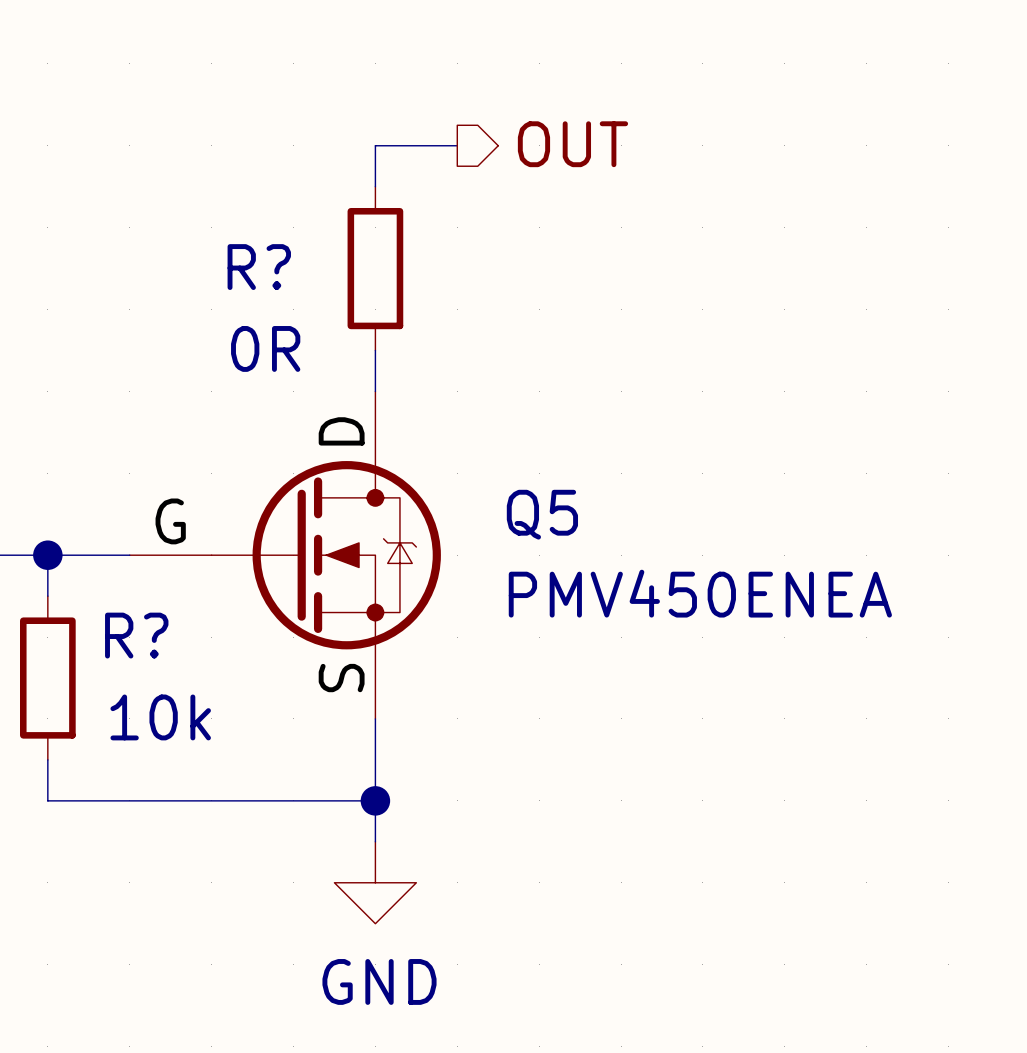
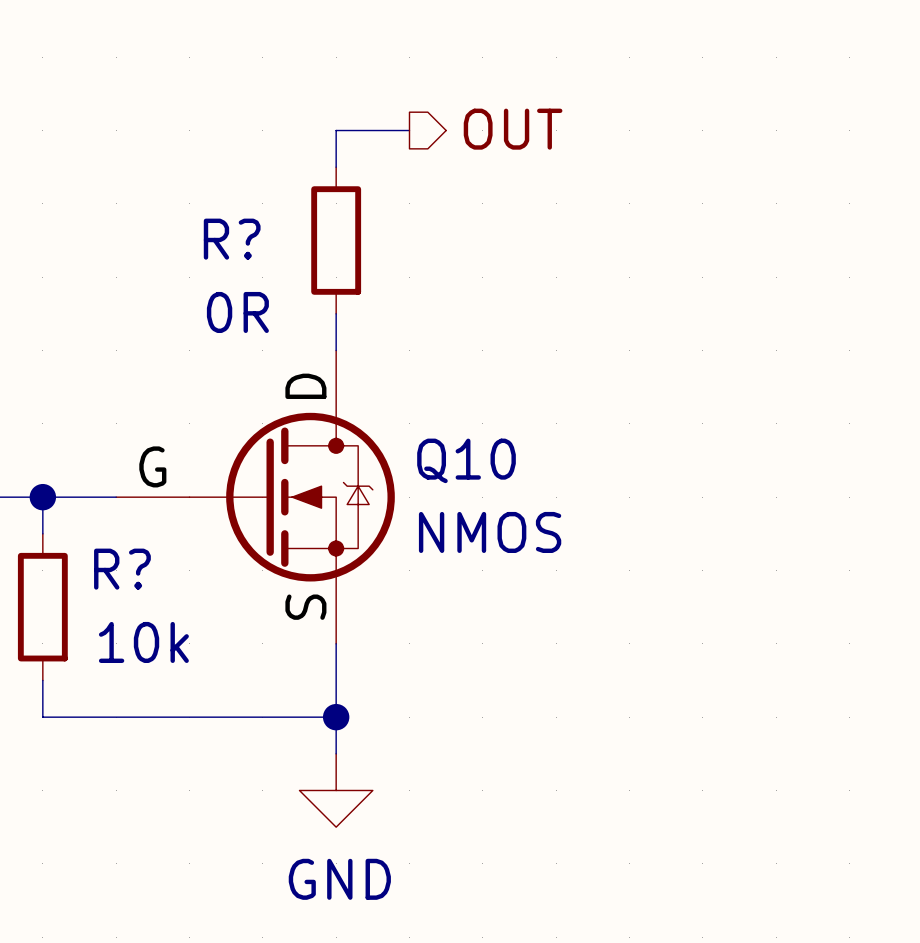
Q5 name: Q5 (542, 514) -> Q10 (466, 460)
Q5 value: PMV450ENEA (700, 593) -> NMOS (490, 532)

